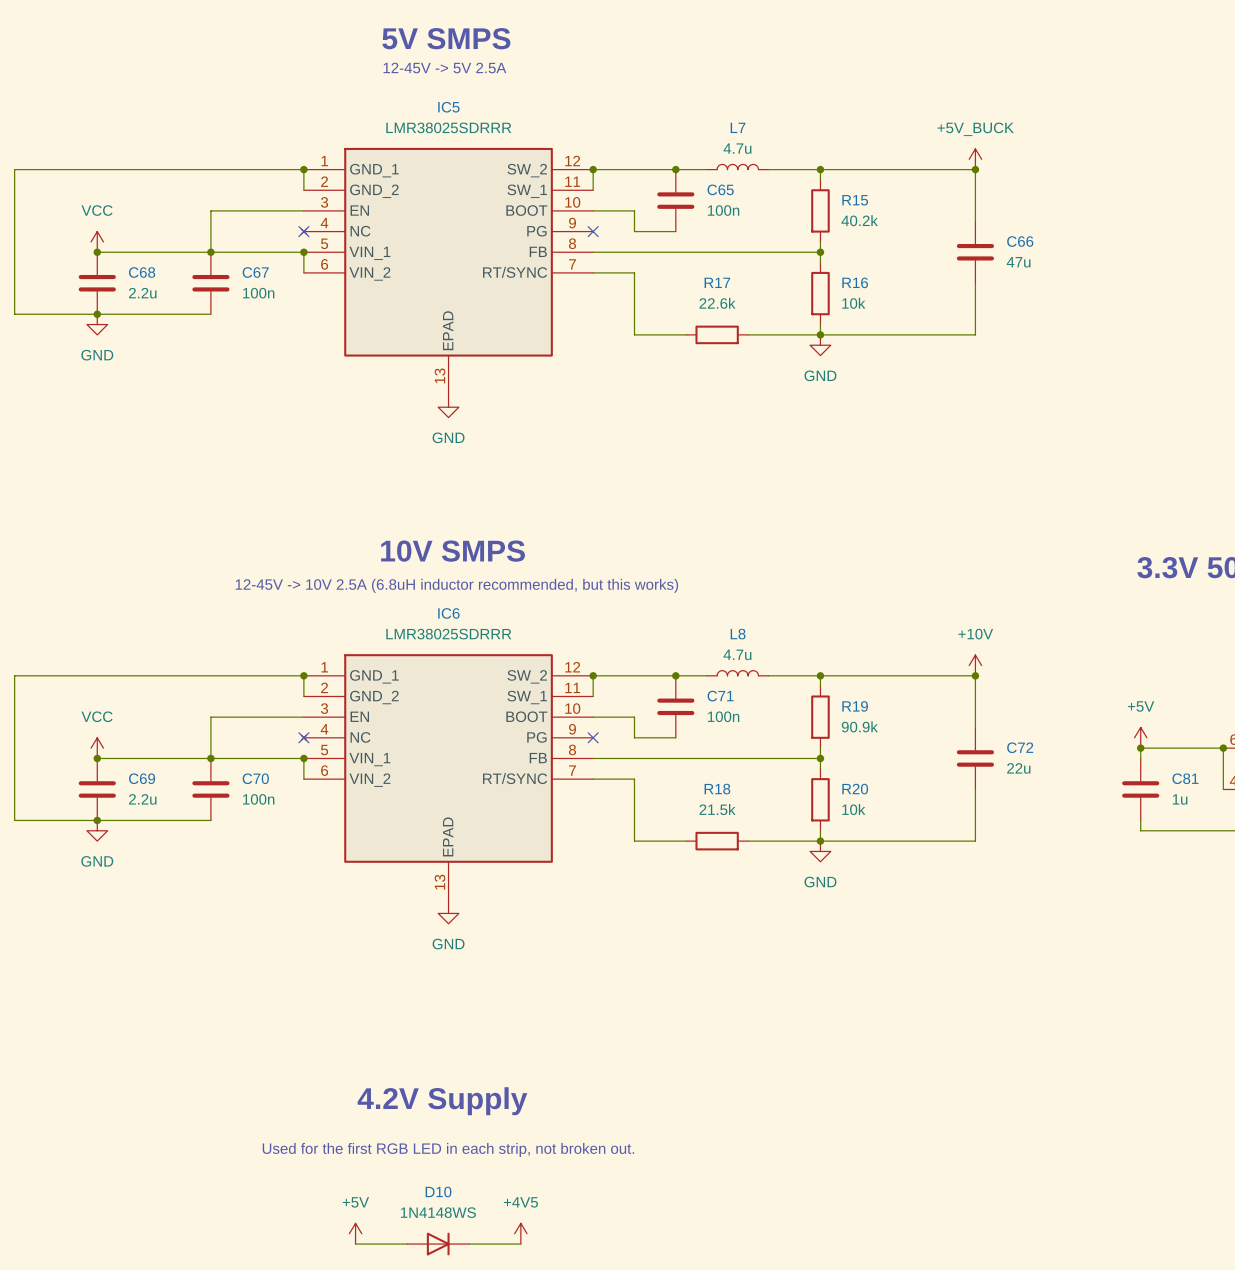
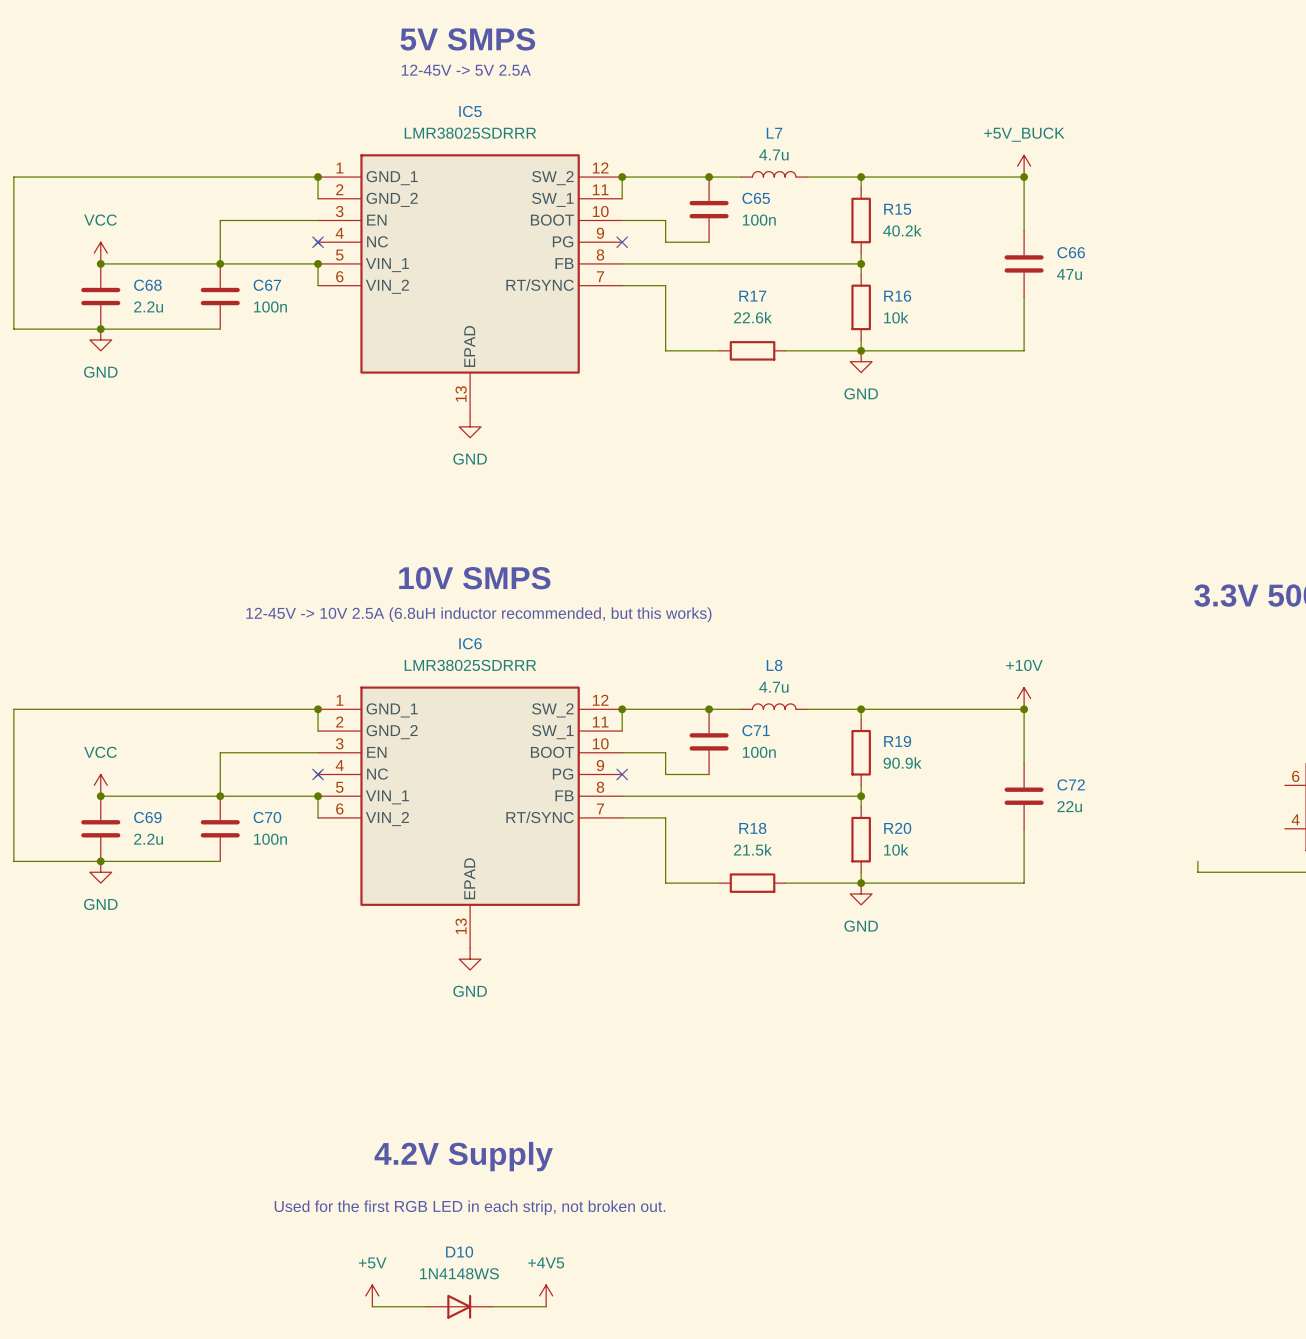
power symbol: +5V (1140, 737) -> none
junction: (1140, 748) -> none
junction: (1223, 748) -> none
wire: (1140, 758) (1140, 748) (1223, 748) (1223, 789) -> none
C81: 1u (1140, 789) -> none

